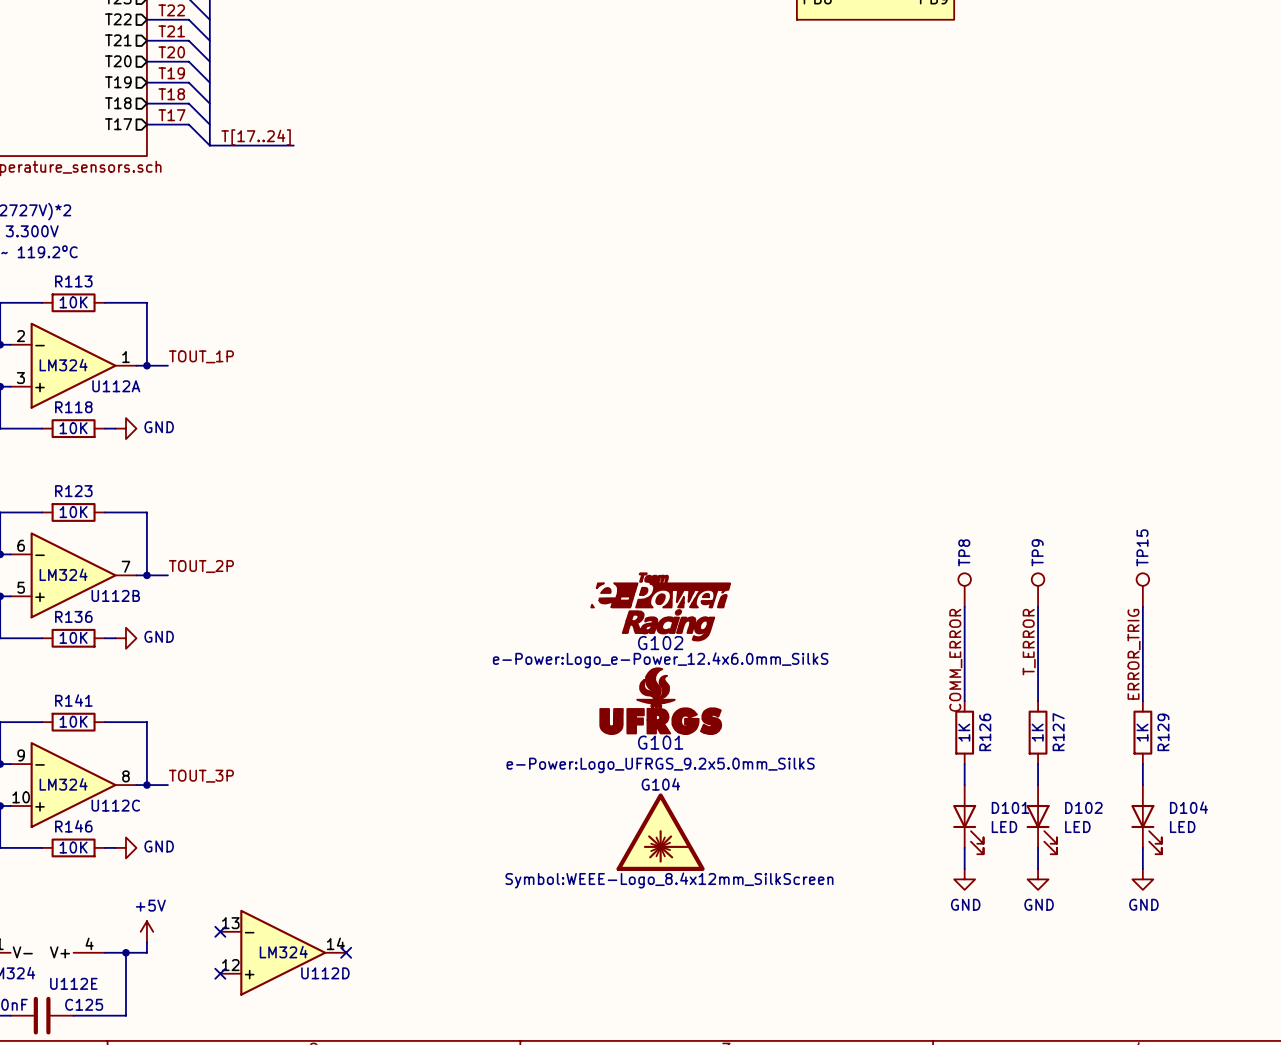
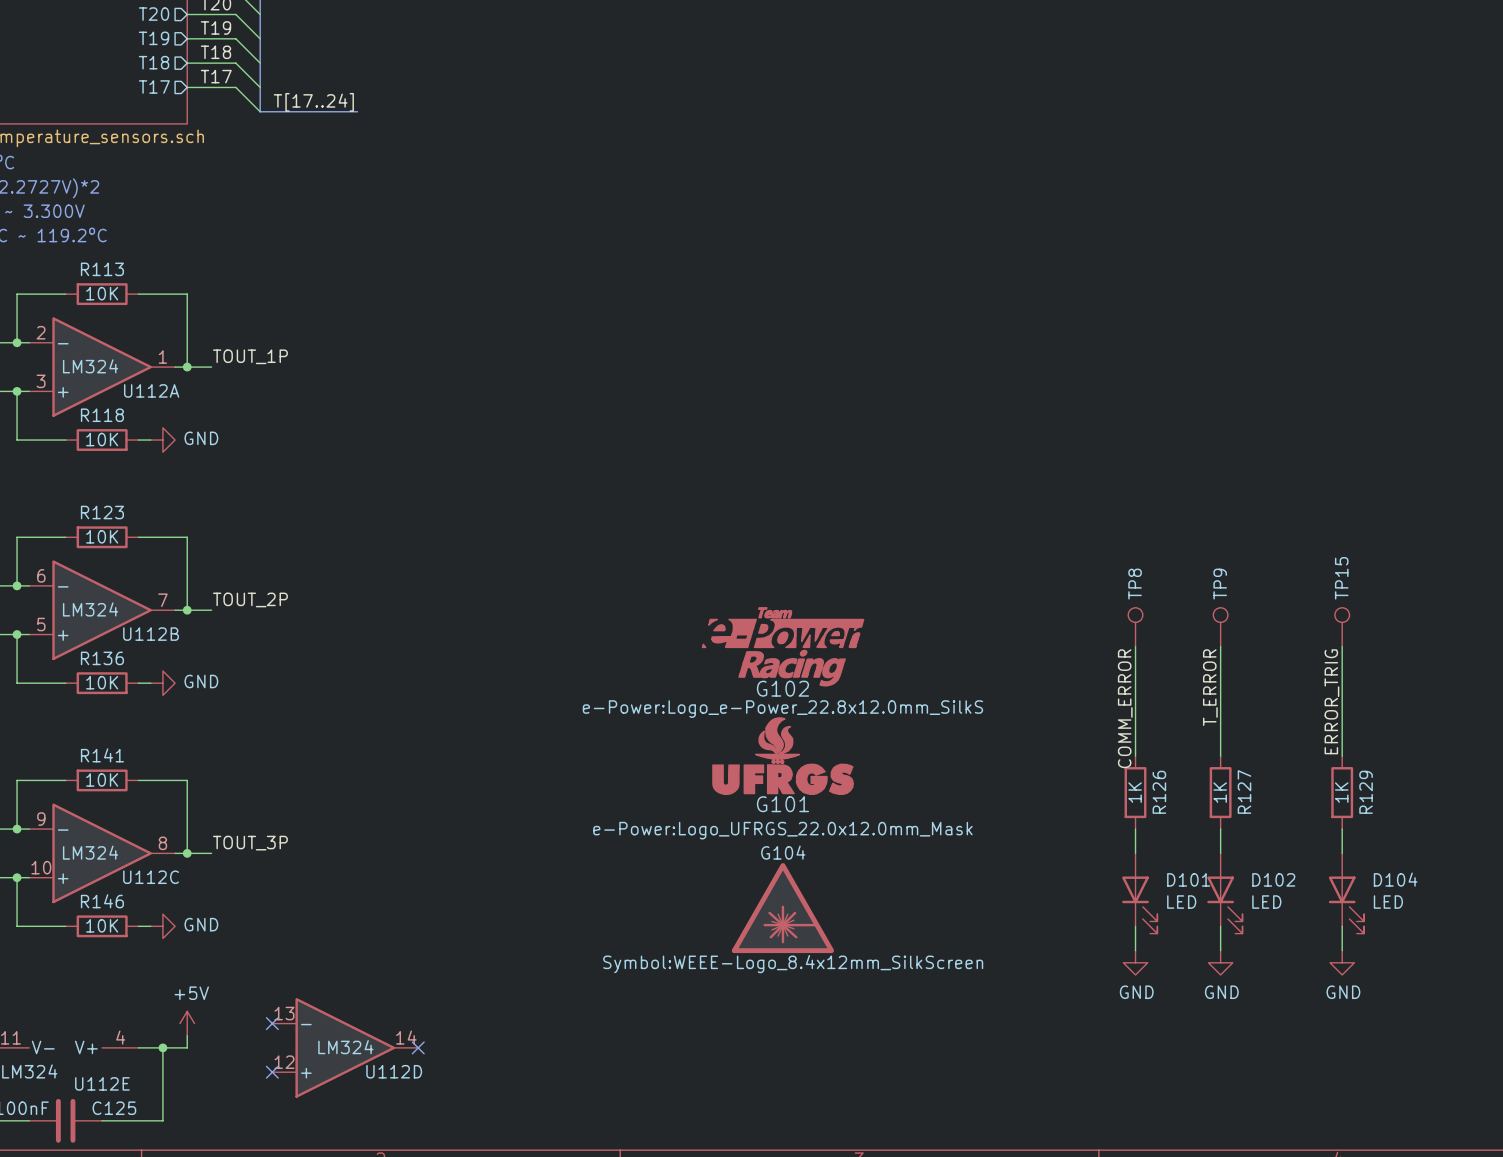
G102 text: e-Power:Logo_e-Power_12.4x6.0mm_SilkS (660, 660) -> e-Power:Logo_e-Power_22.8x12.0mm_SilkS (782, 709)
G101 text: e-Power:Logo_UFRGS_9.2x5.0mm_SilkS (660, 765) -> e-Power:Logo_UFRGS_22.0x12.0mm_Mask (782, 830)

